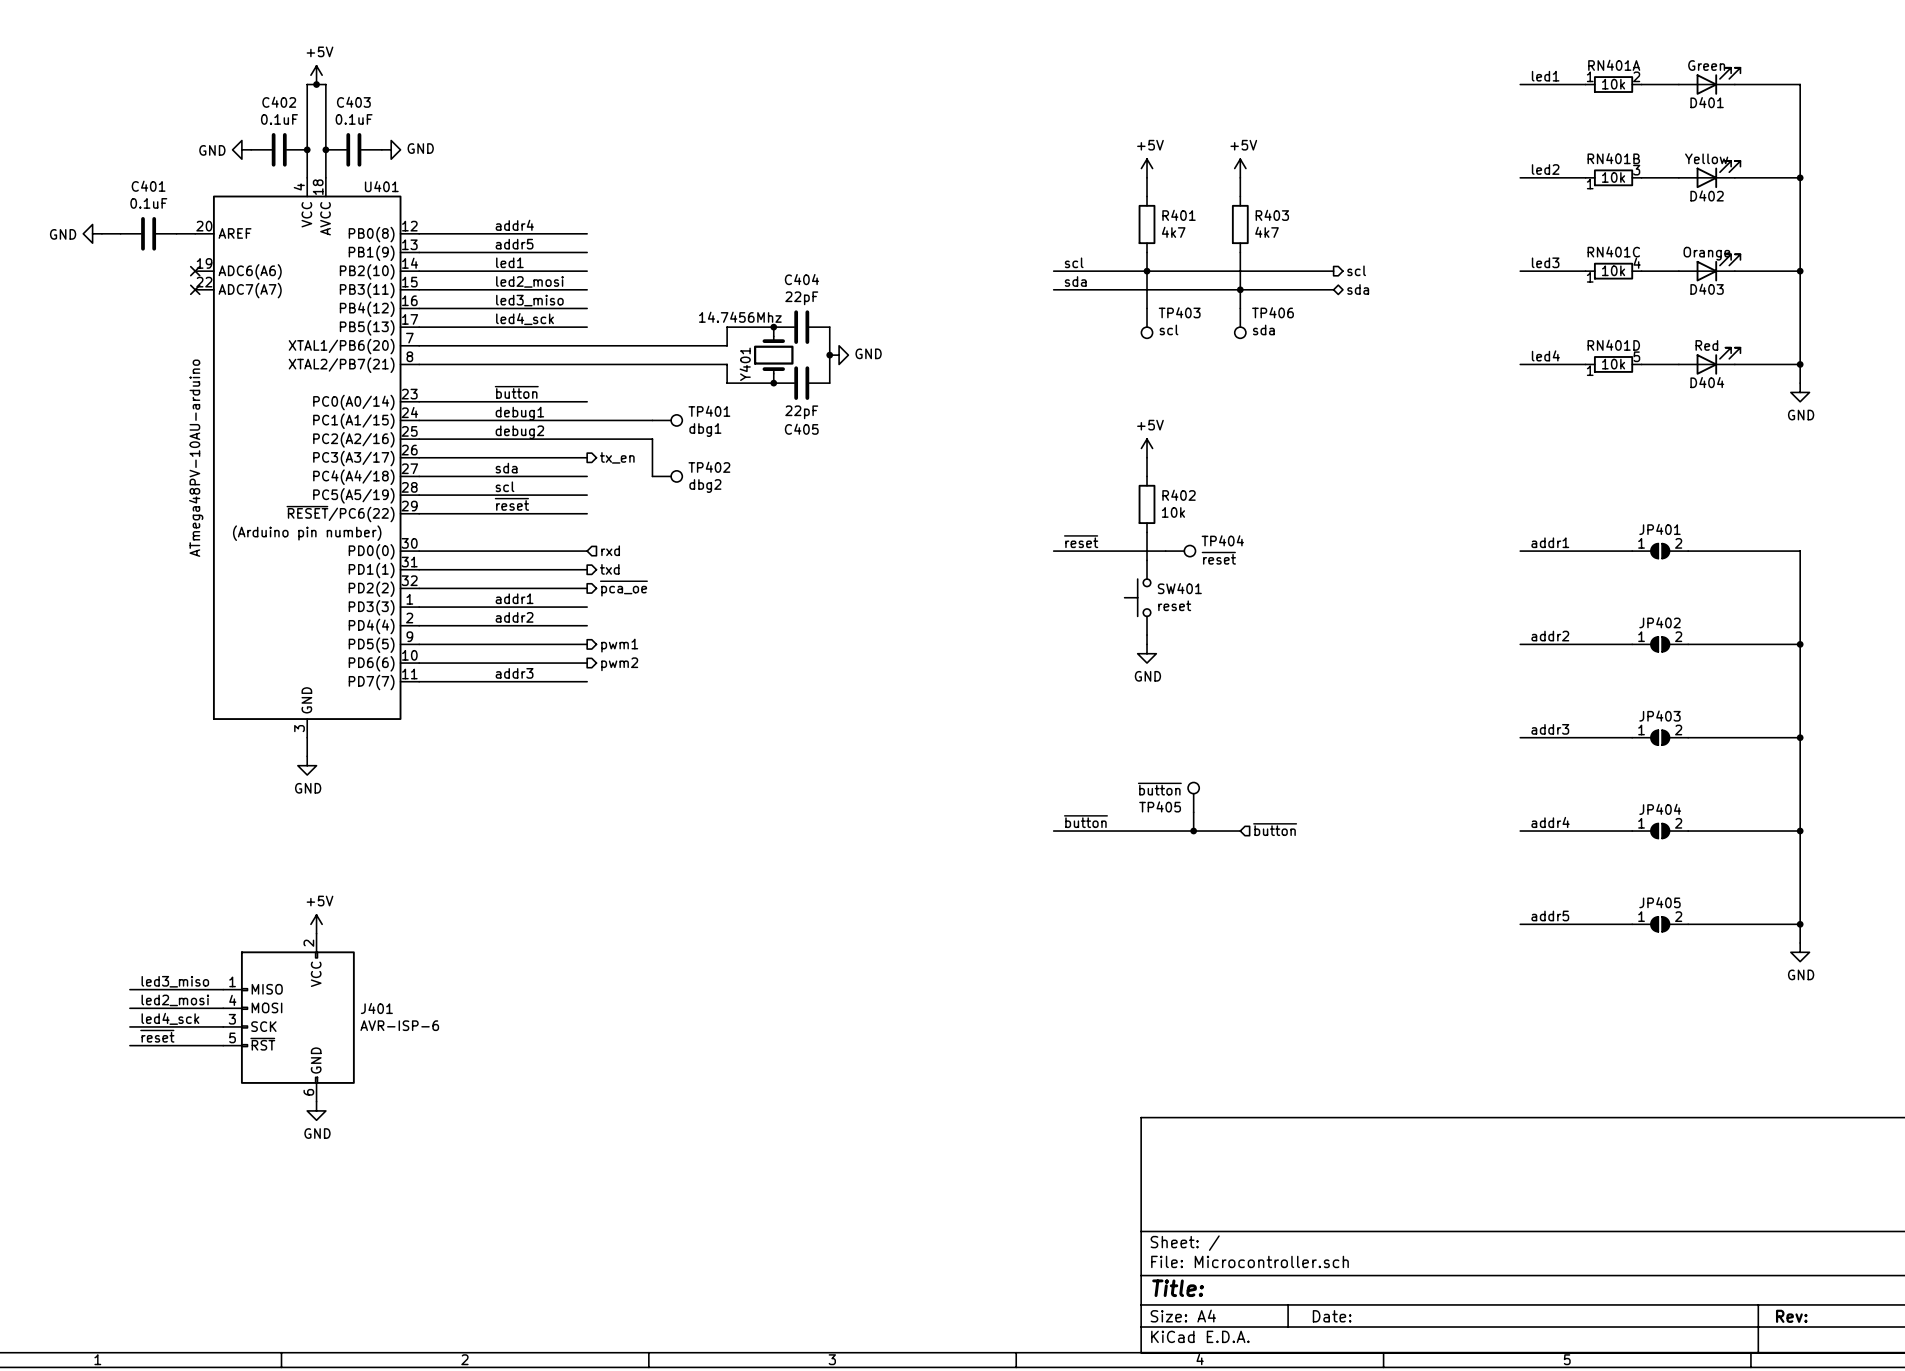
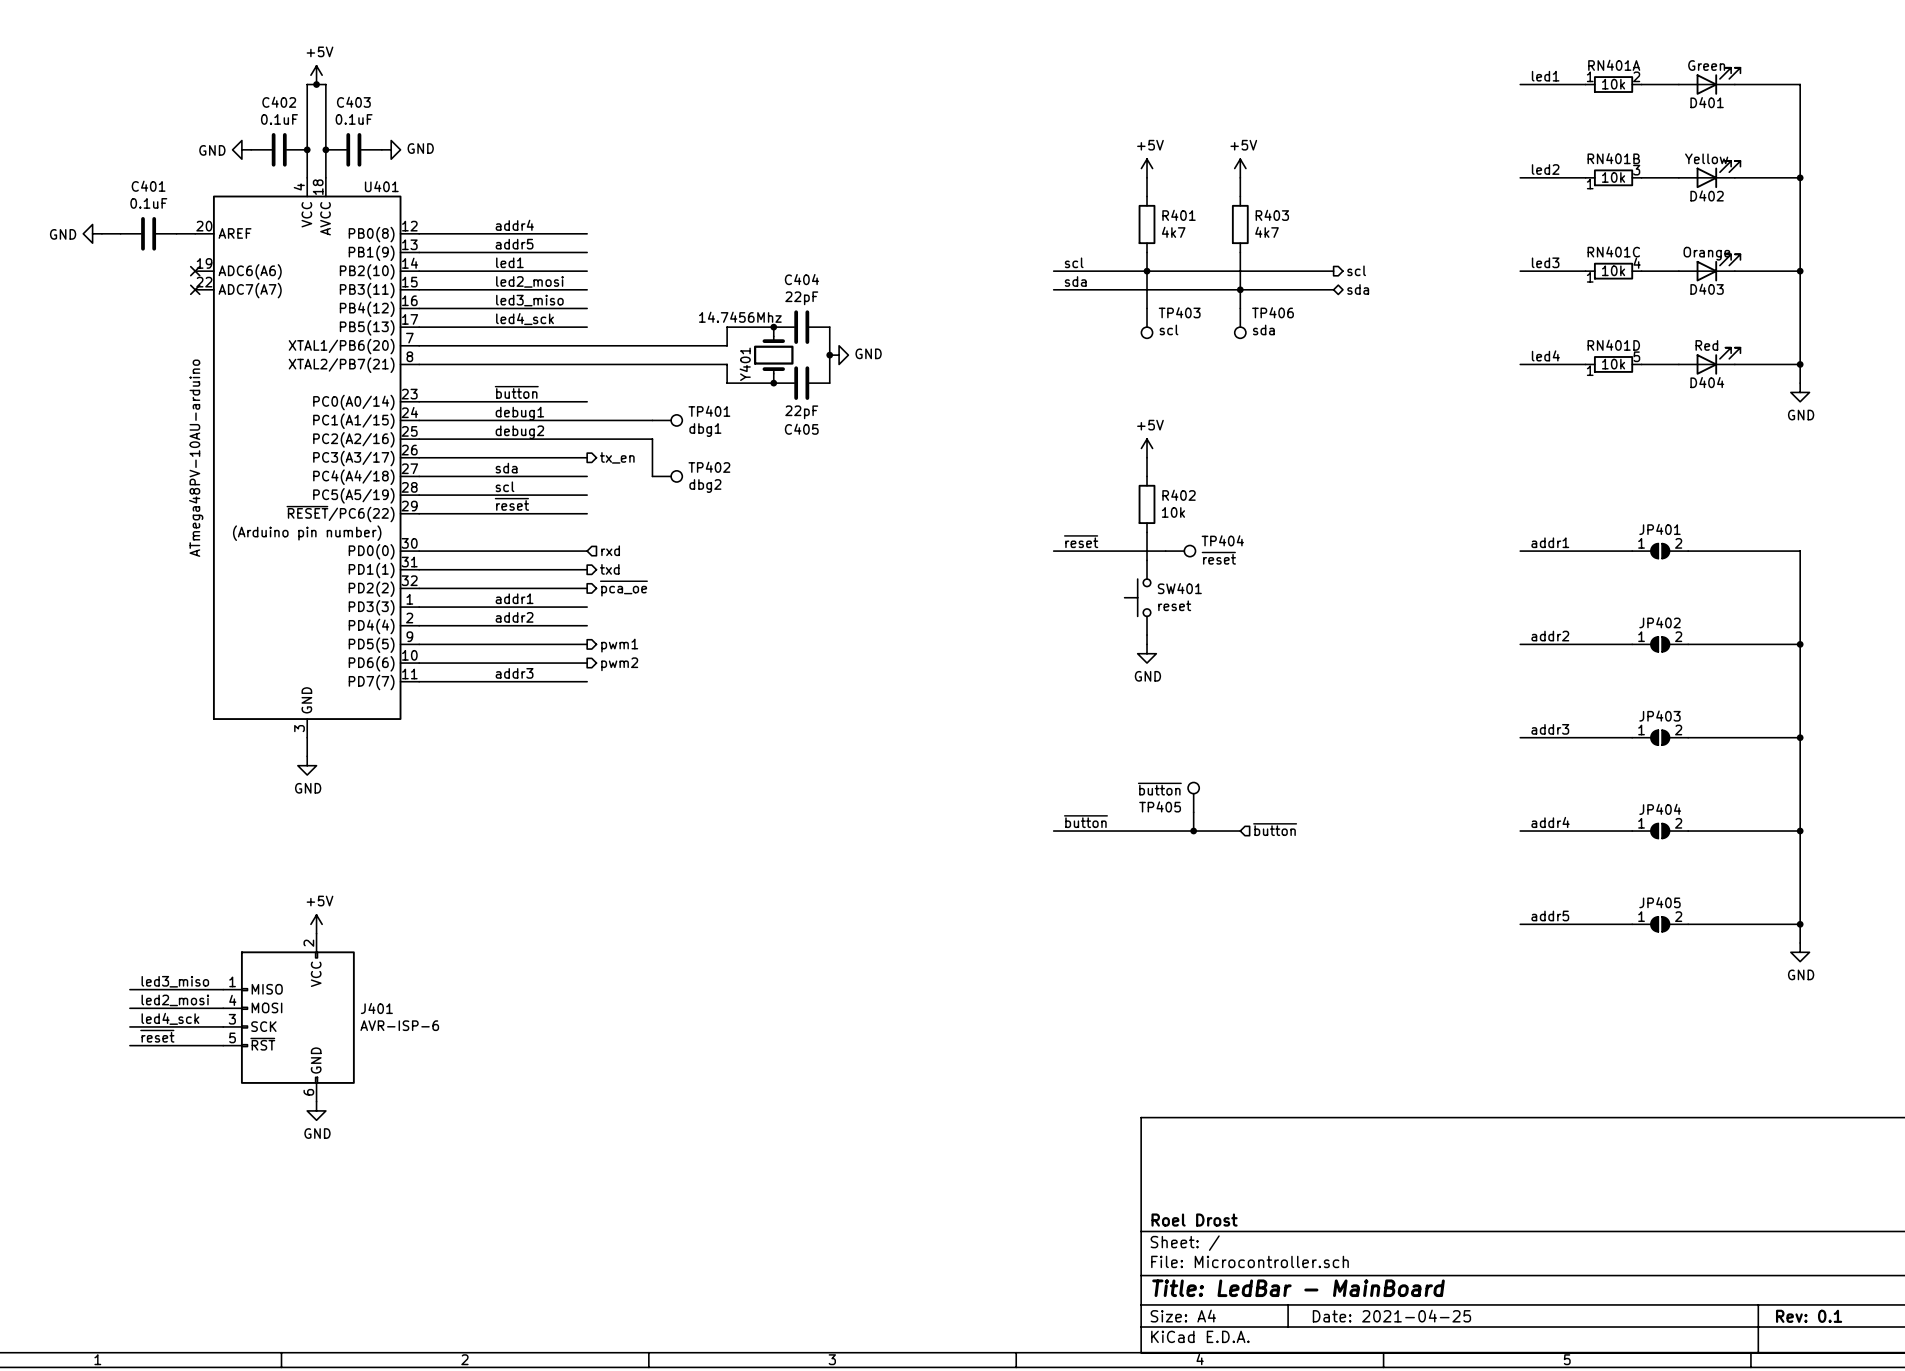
title block: none -> Roel Drost (1194, 1220)
title block: Title: (1178, 1288) -> Title: LedBar - MainBoard (1298, 1288)
title block: Date: (1332, 1316) -> Date: 2021-04-25 (1391, 1316)
title block: Rev: (1791, 1316) -> Rev: 0.1 (1809, 1316)

